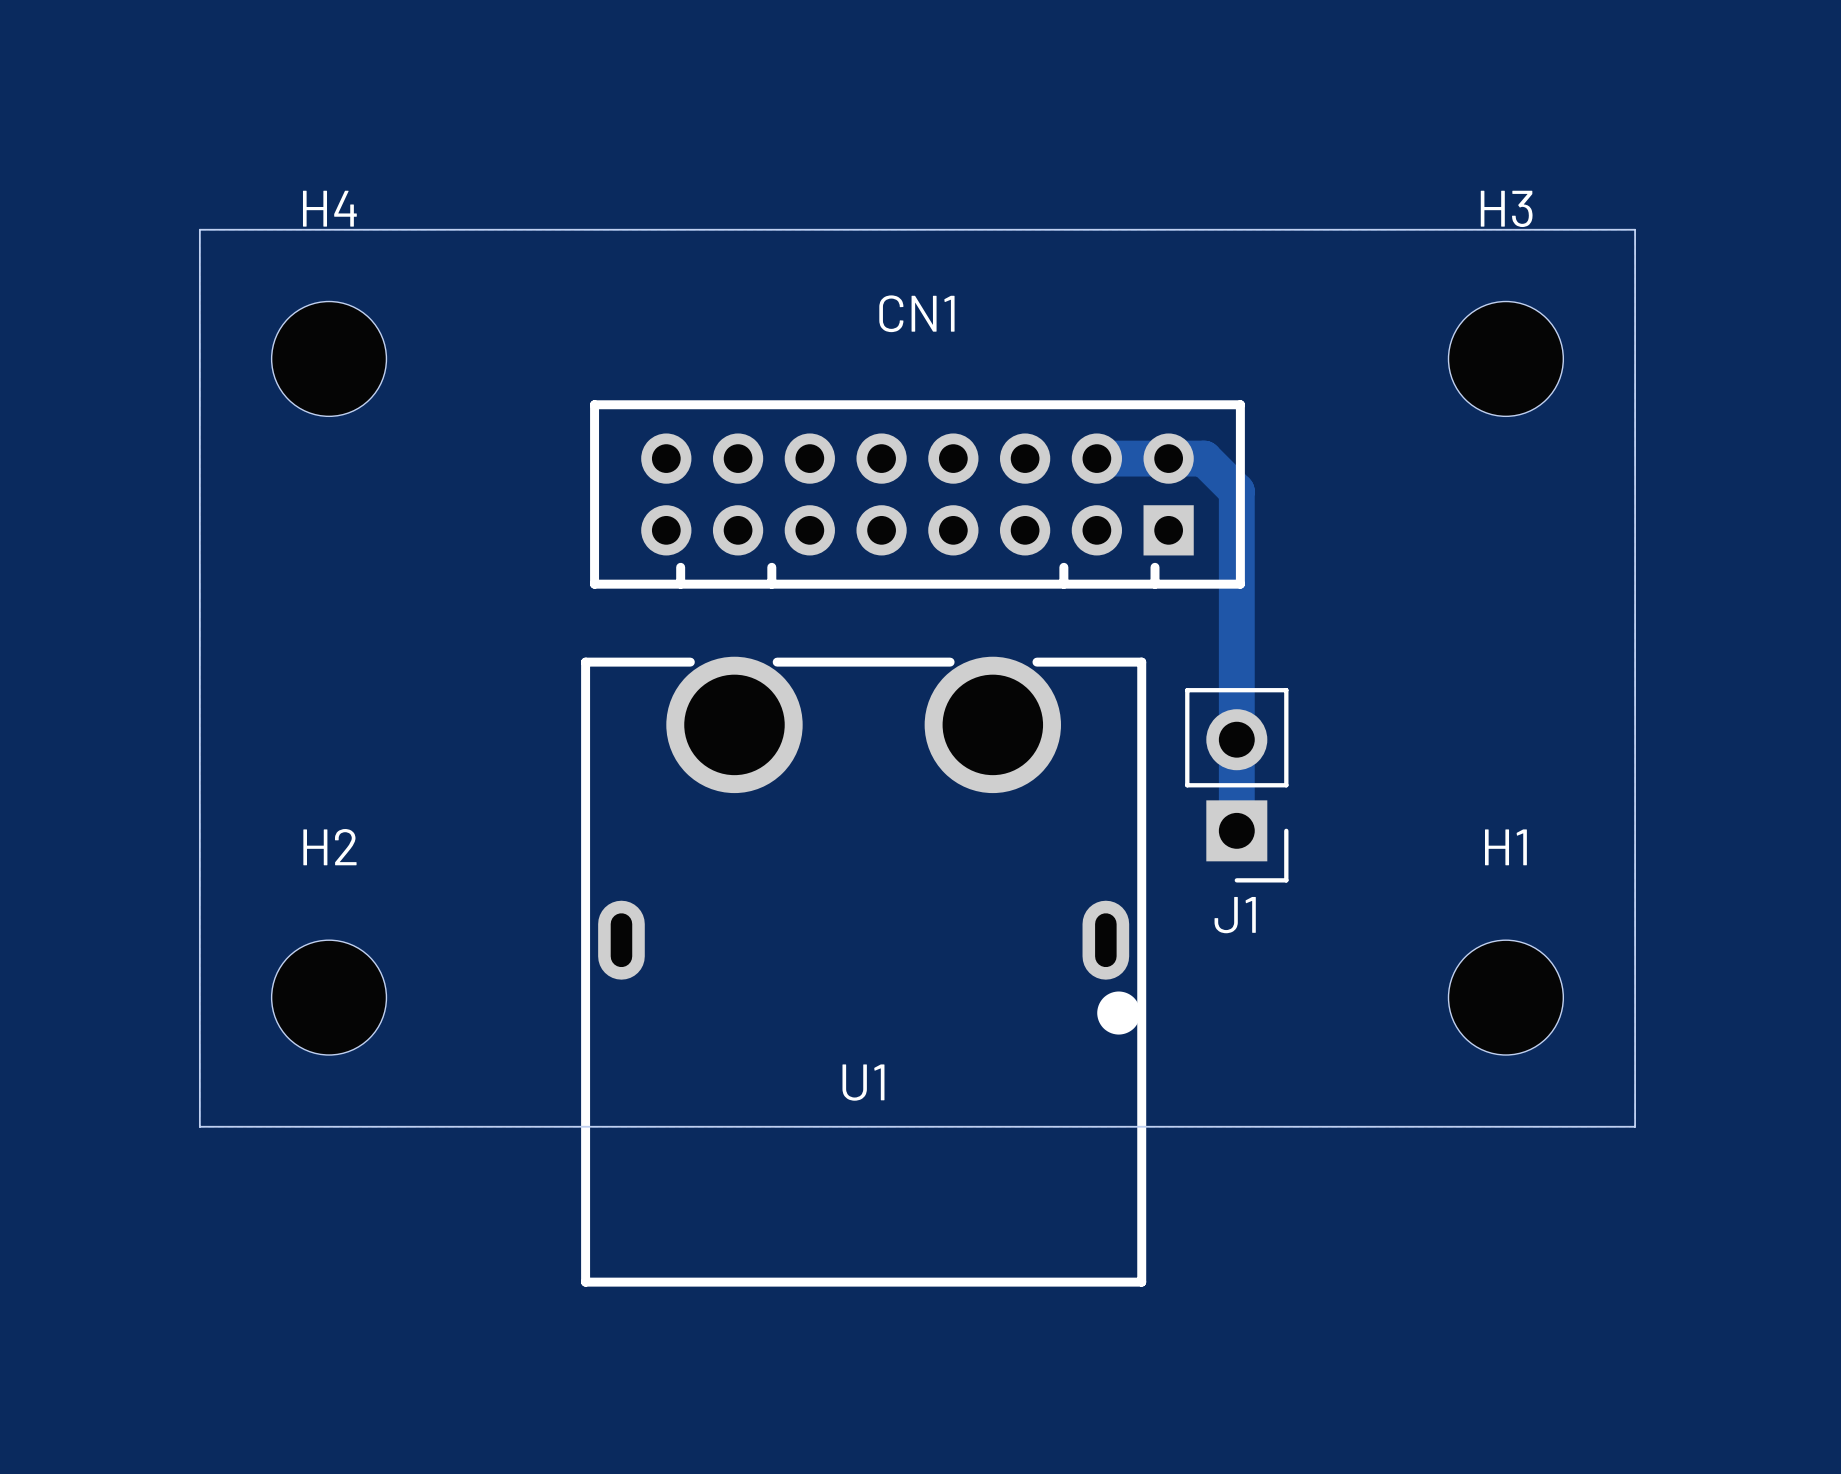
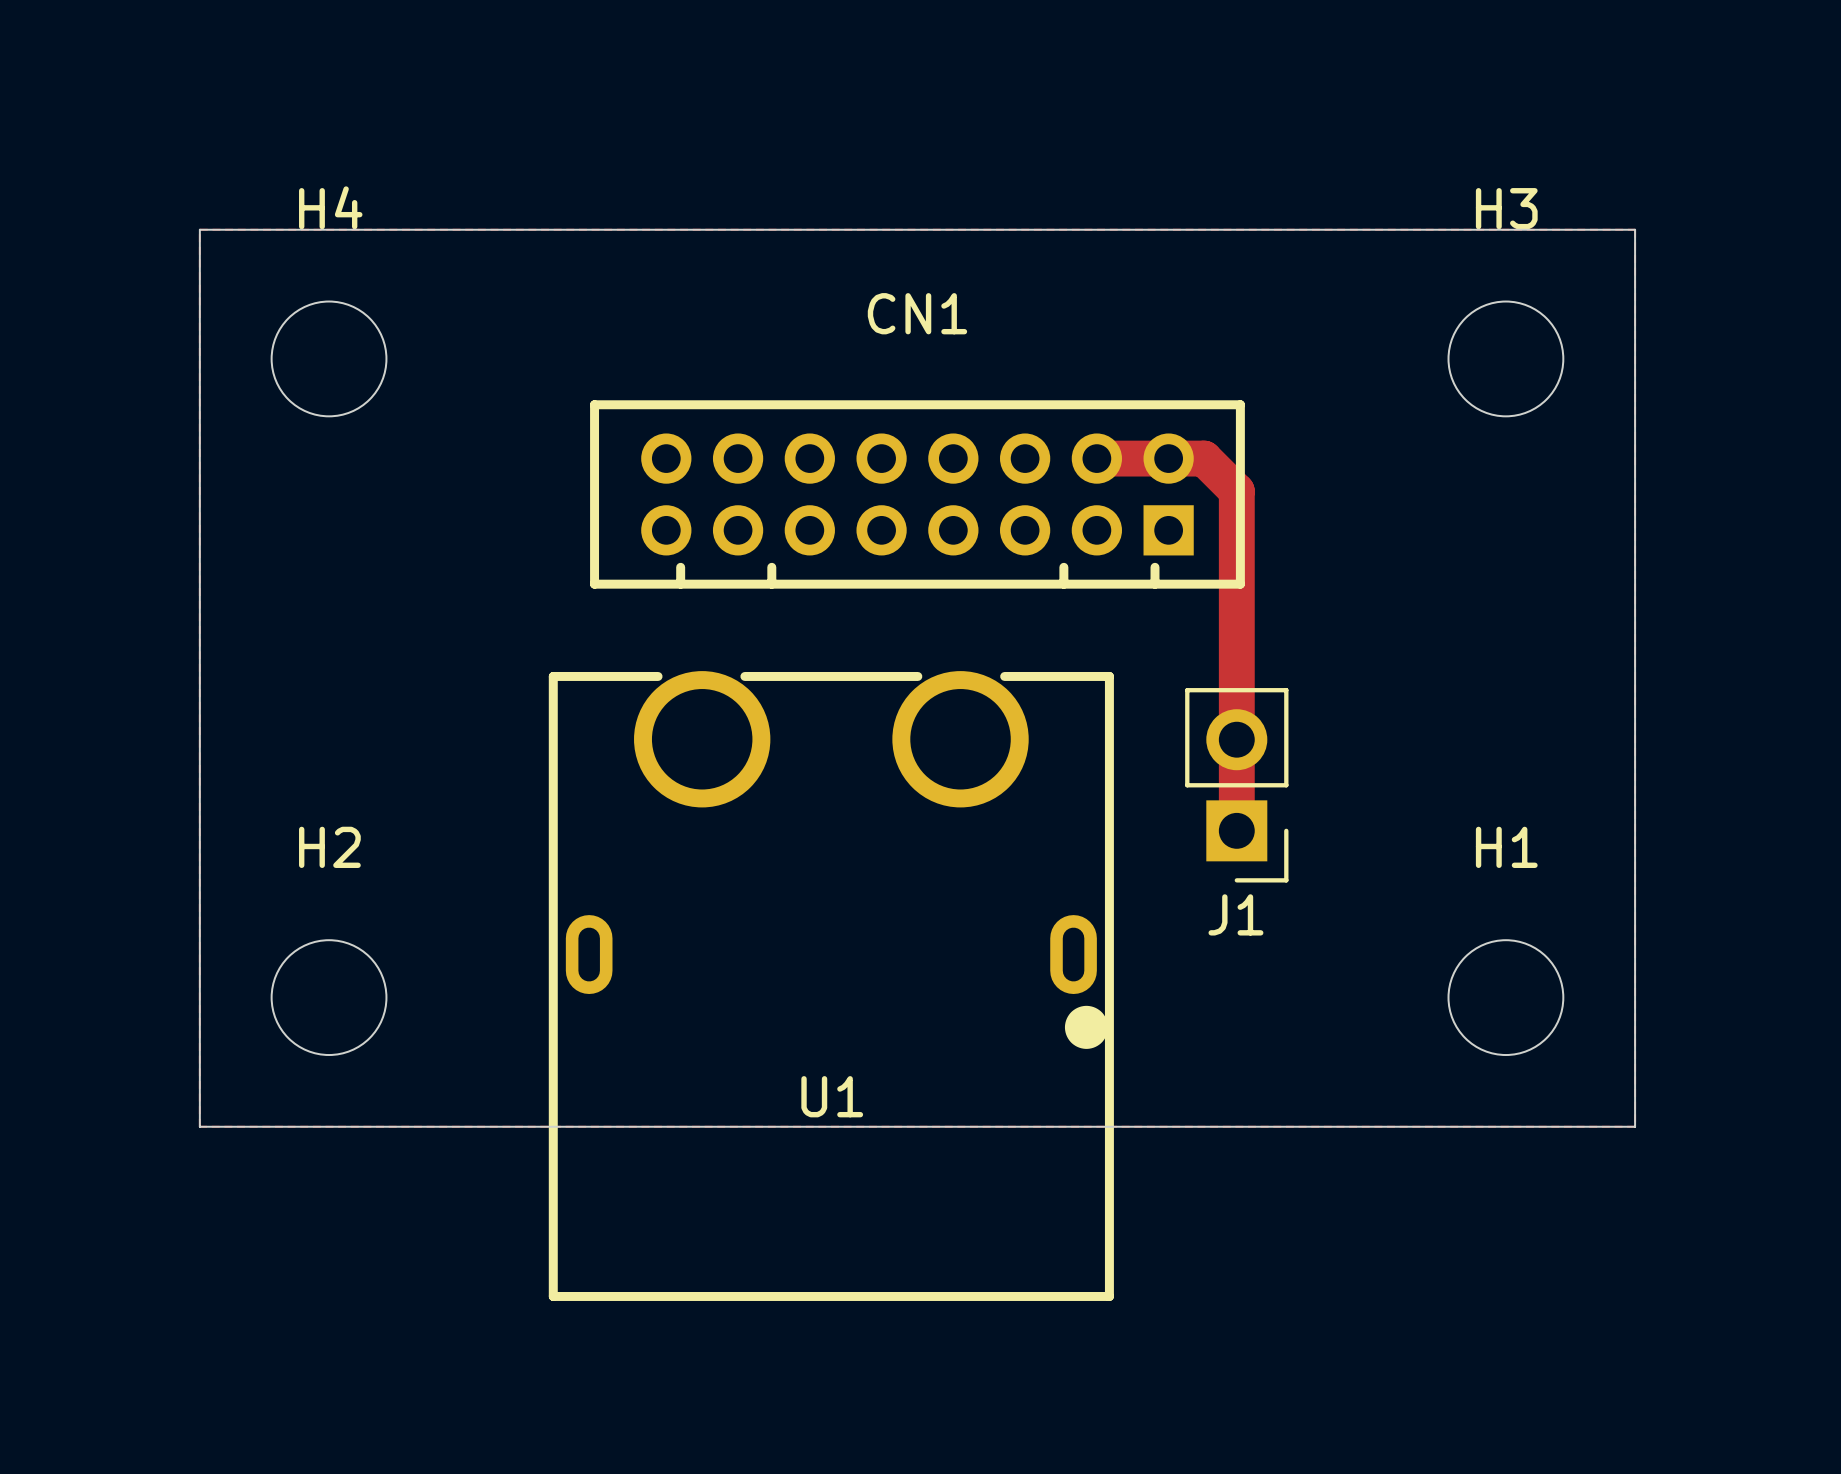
U1 position: (863, 971) -> (831, 986)

